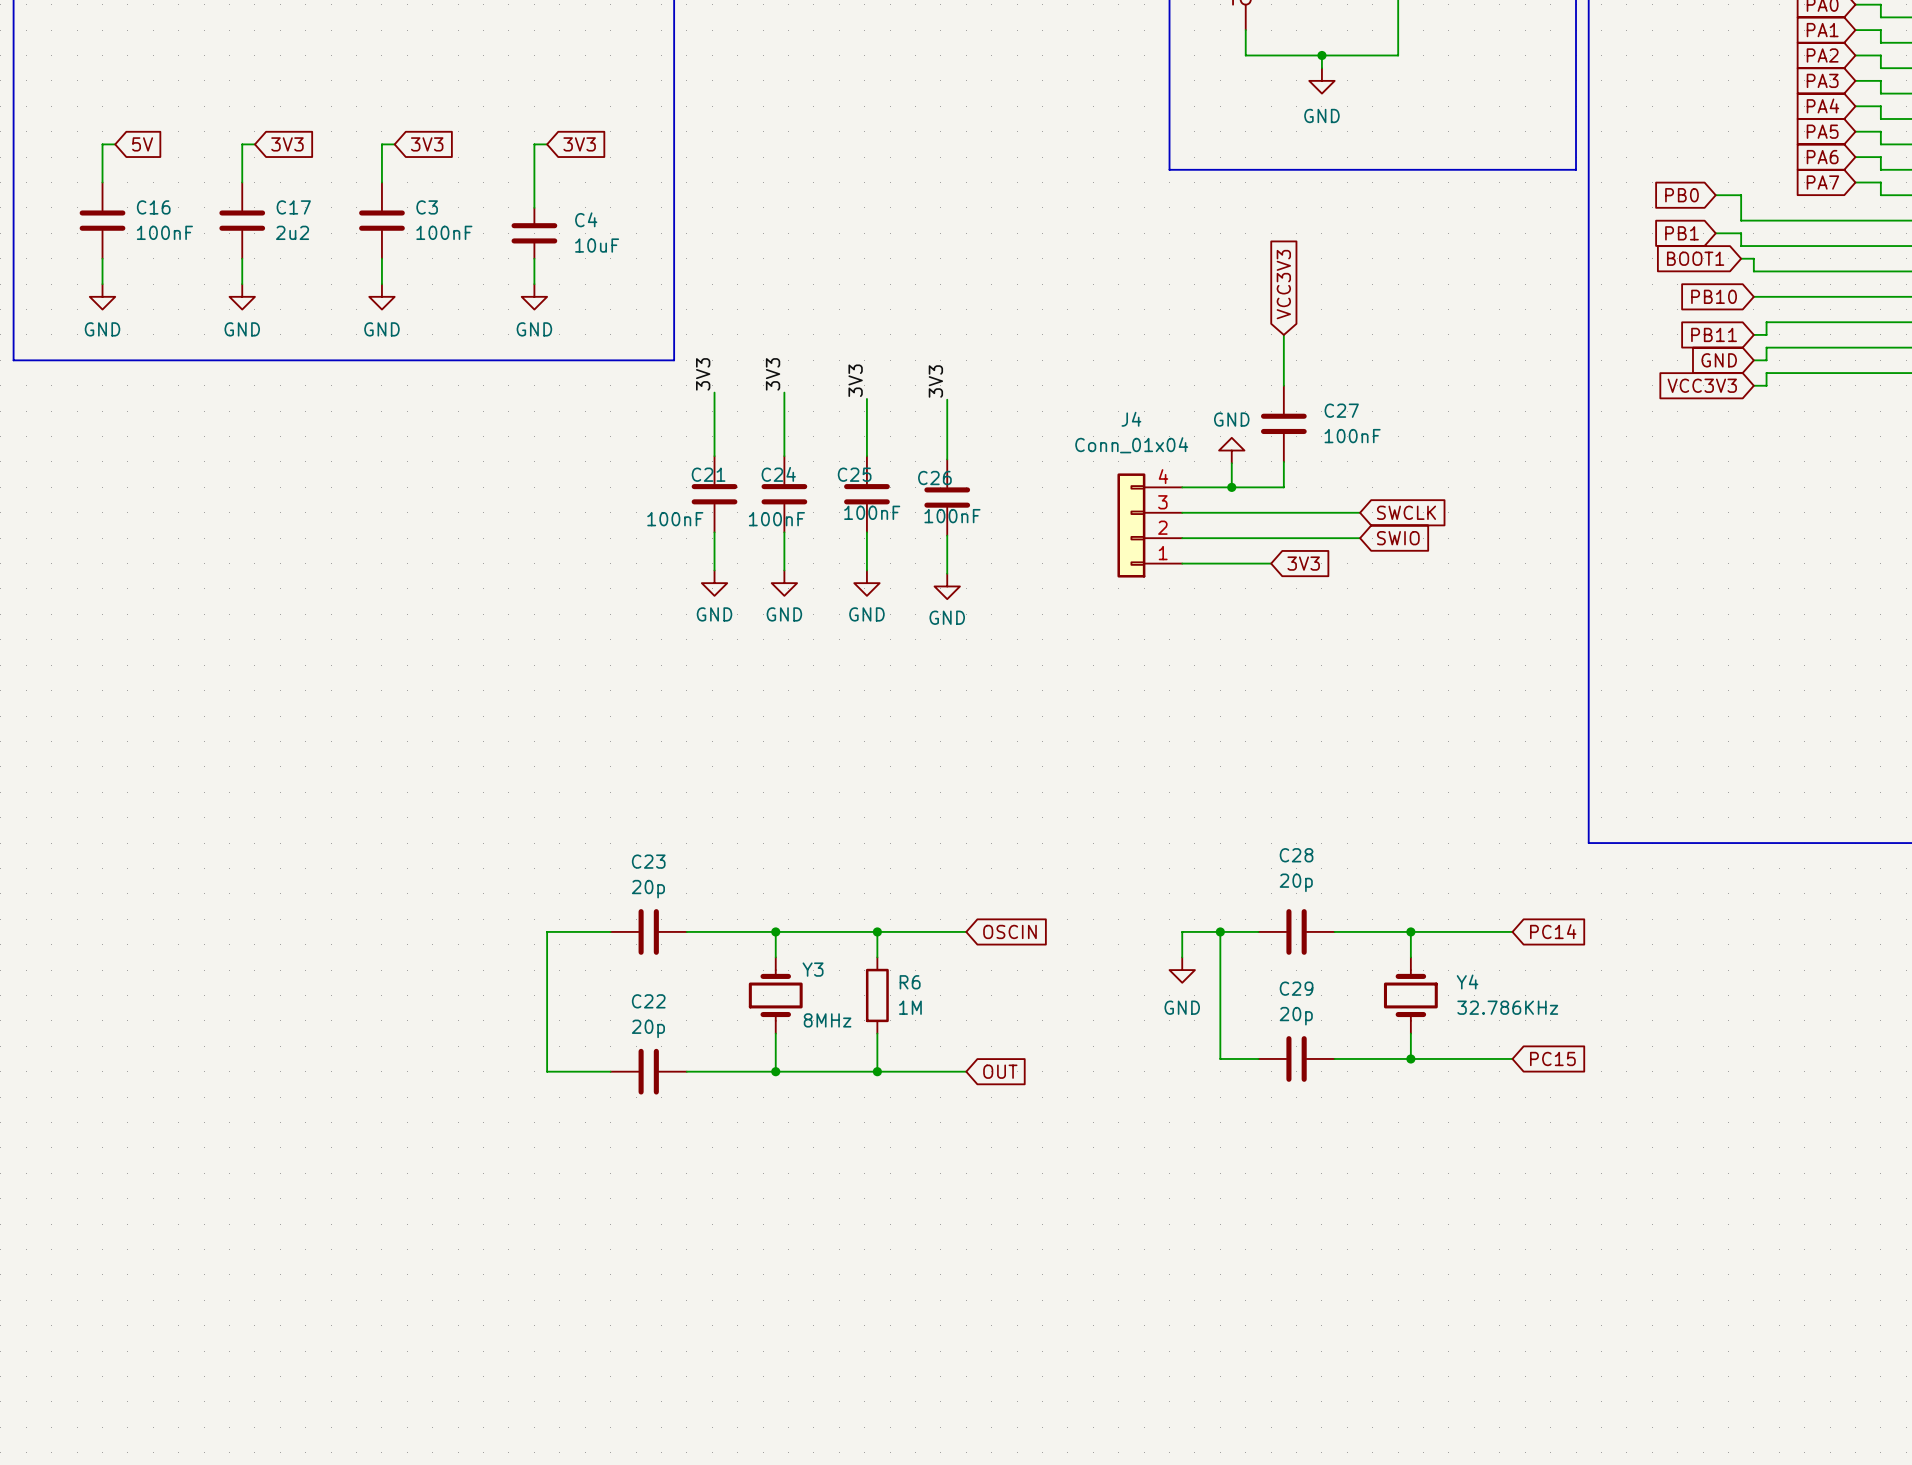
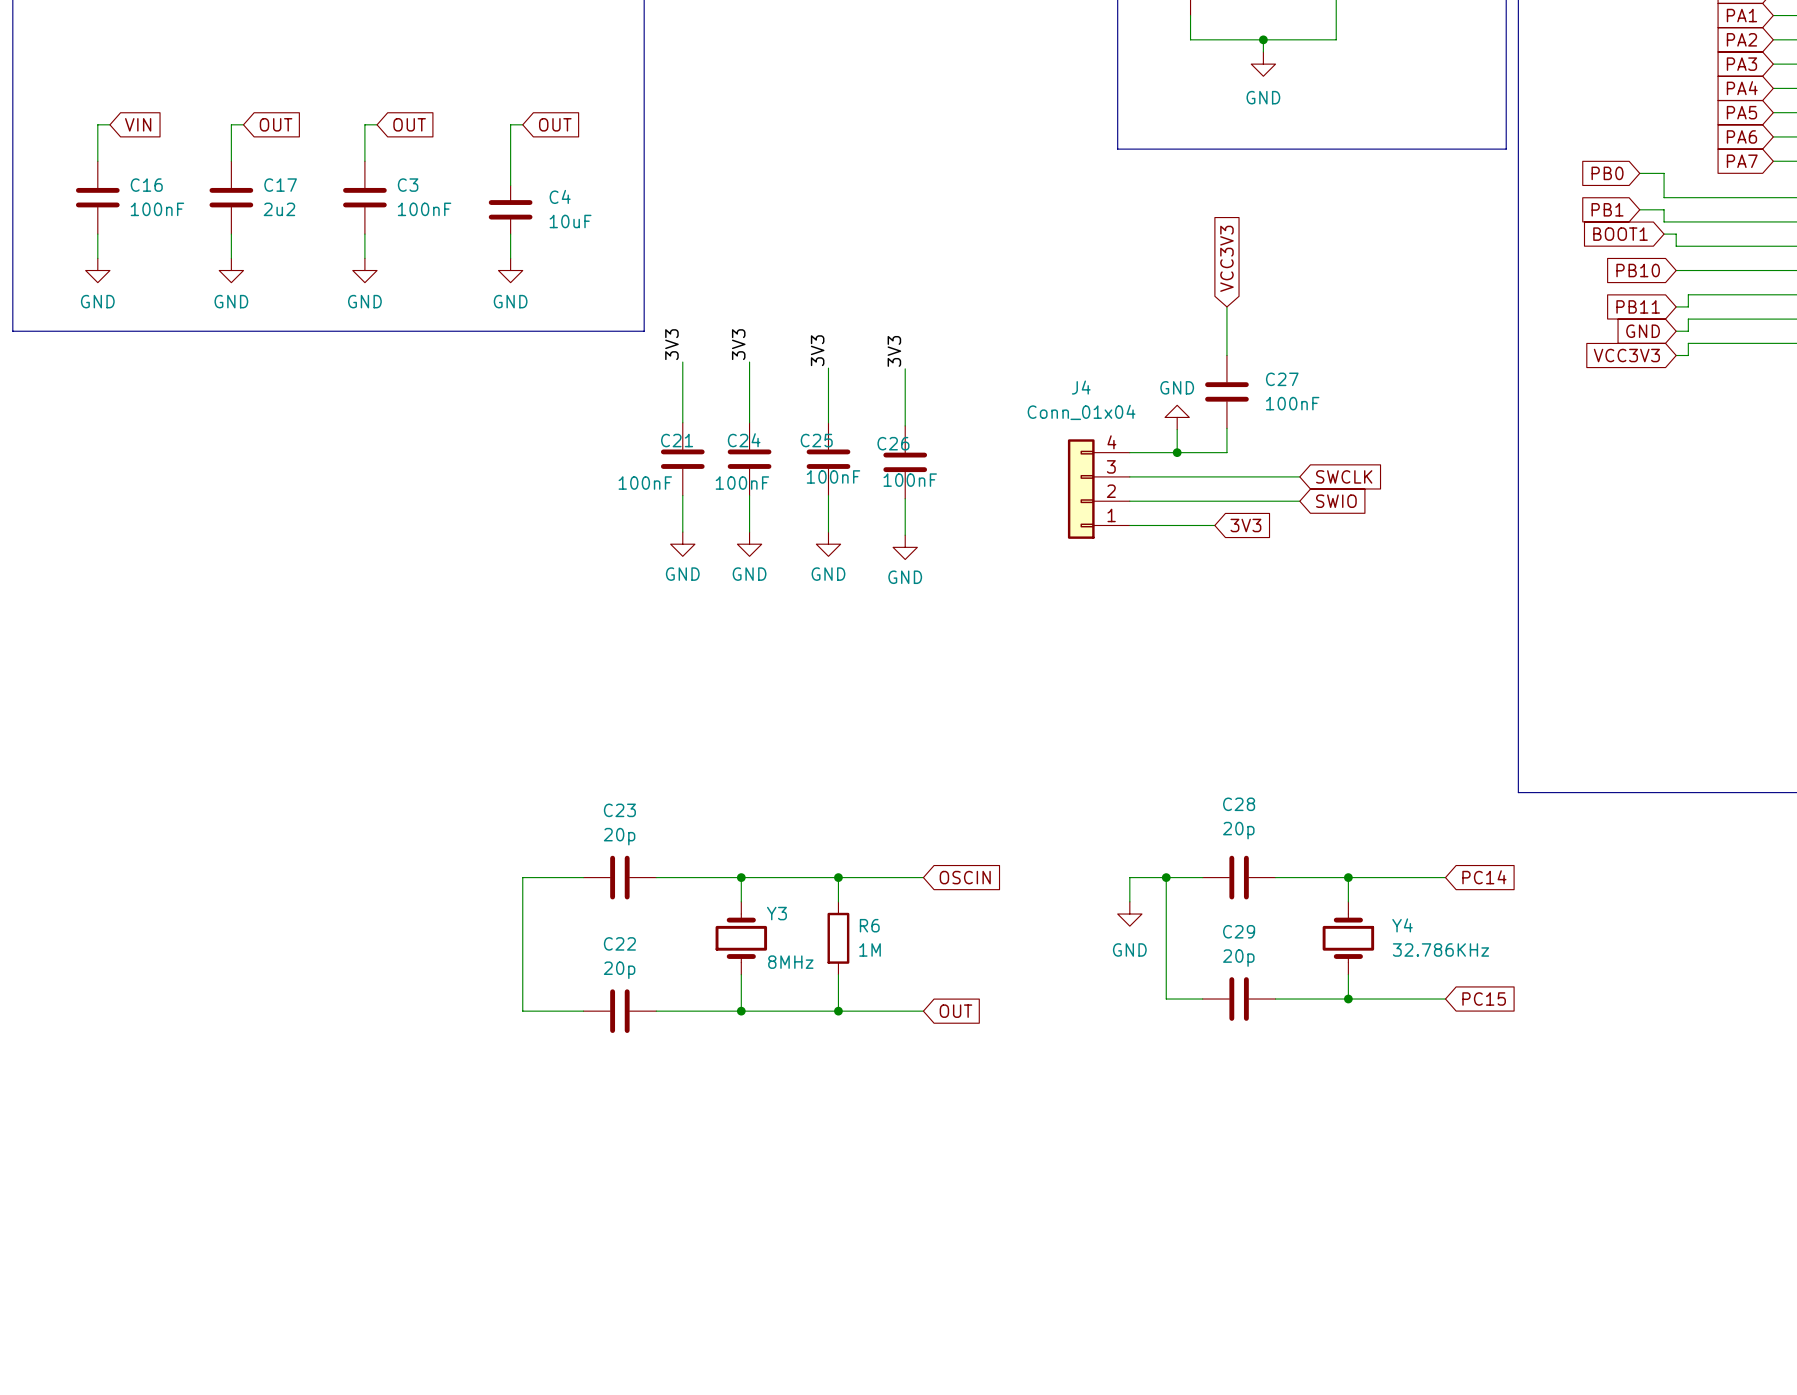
global label: 5V (142, 144) -> VIN (138, 124)
global label: 3V3 (287, 144) -> OUT (276, 124)
global label: 3V3 (427, 144) -> OUT (409, 124)
global label: 3V3 (579, 144) -> OUT (555, 124)

